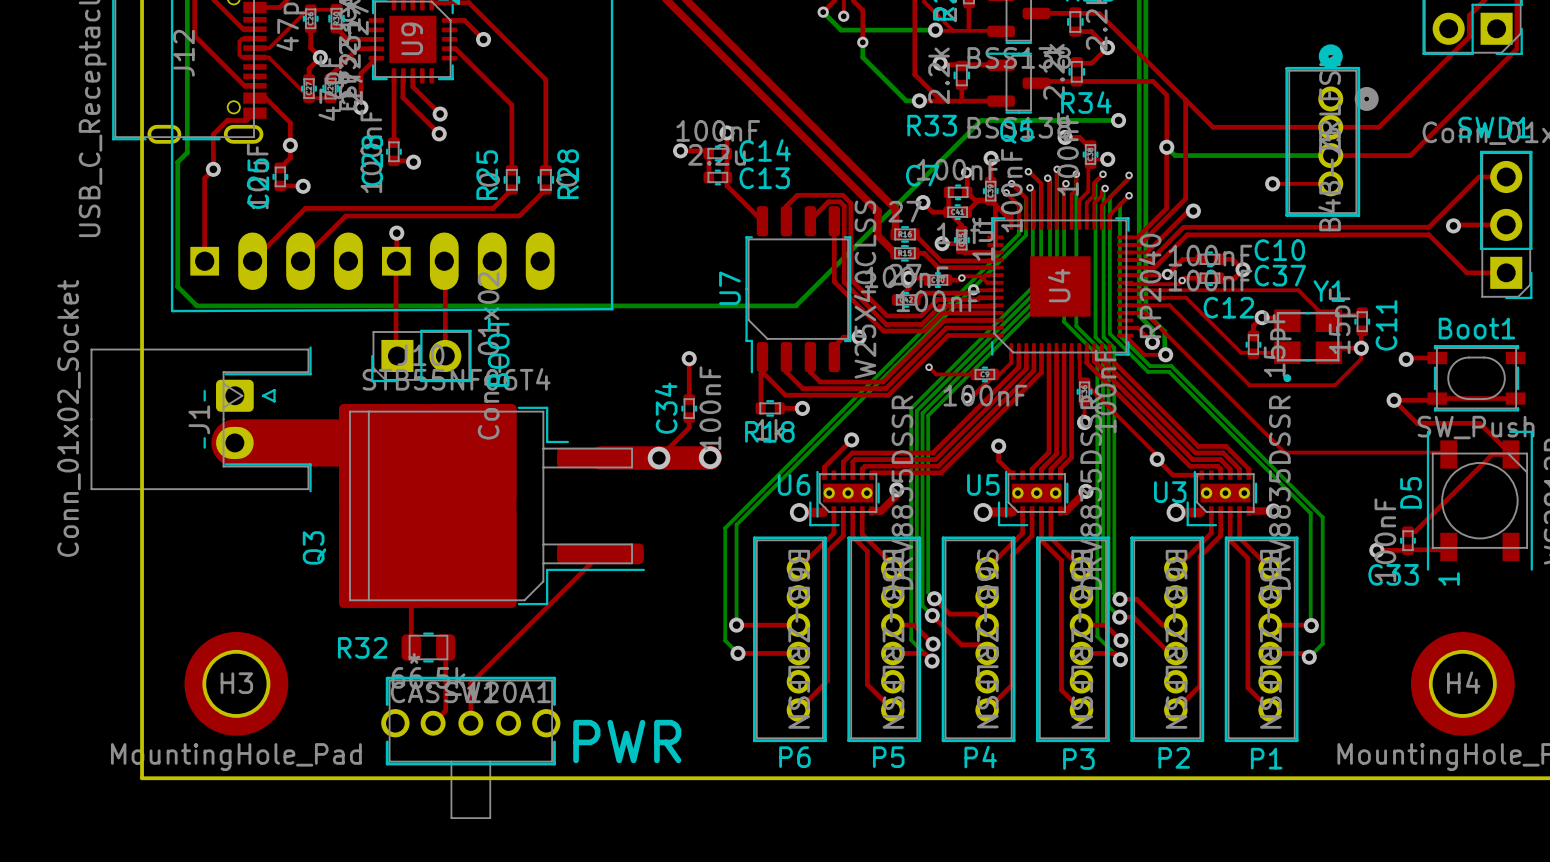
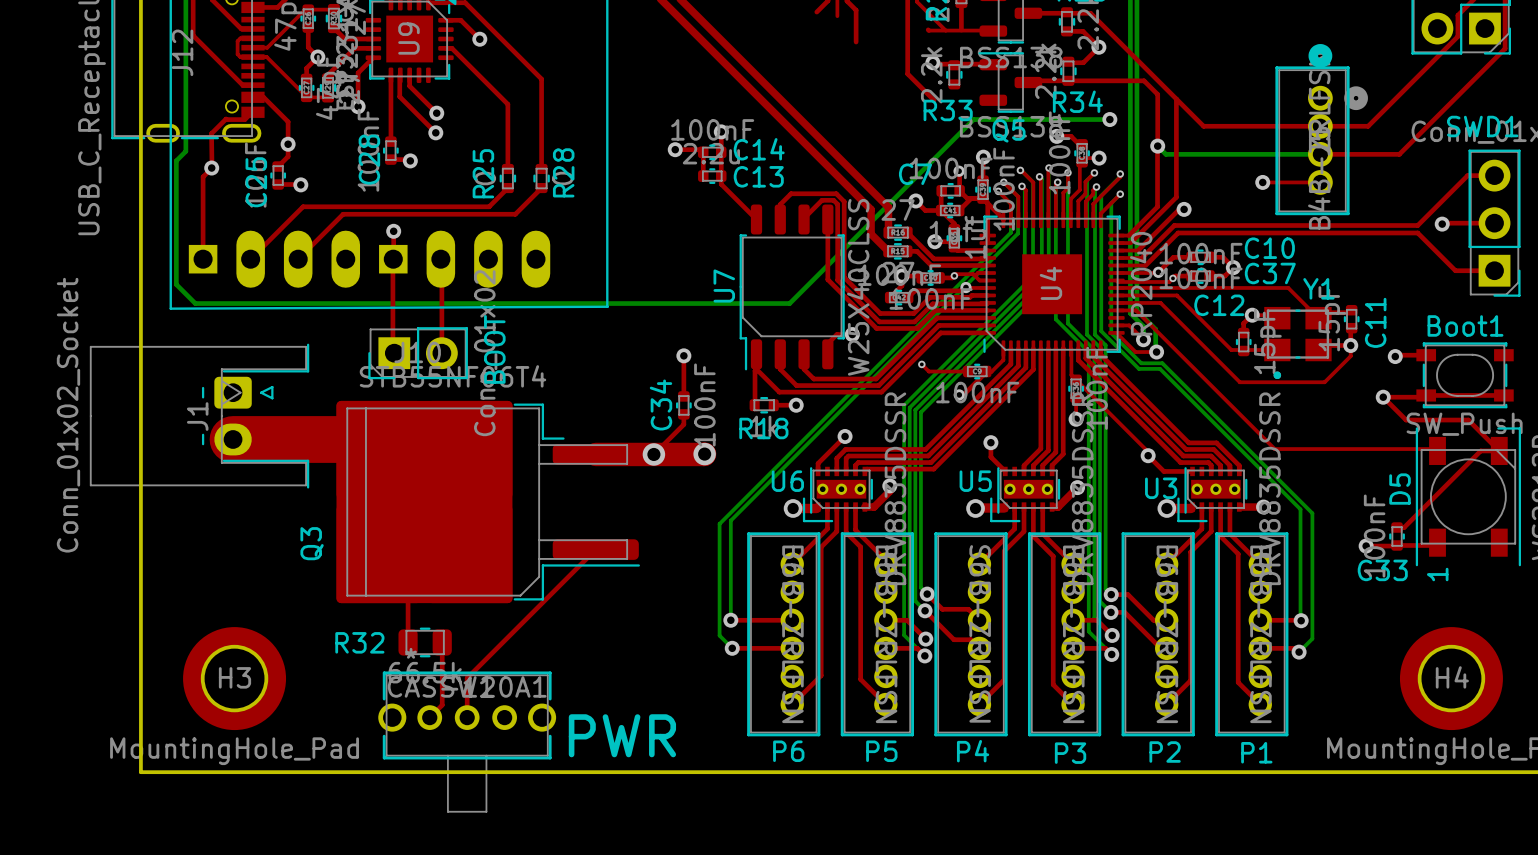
bottom track: (823, 12) (841, 30) (935, 30) -> none
via: (823, 12) -> none
via: (843, 16) -> none
via: (935, 30) -> none
bottom track: (862, 42) (862, 57) (906, 100) (919, 100) -> none
via: (862, 42) -> none
top track: (961, 85) (960, 101) -> none
via: (919, 100) -> none
top track: (919, 101) (1001, 101) -> none
R33 name position: R33 (932, 125) -> R33 (948, 110)

